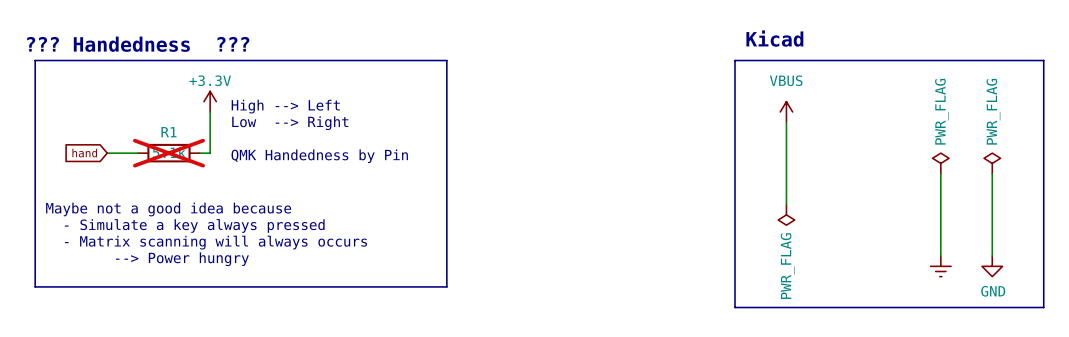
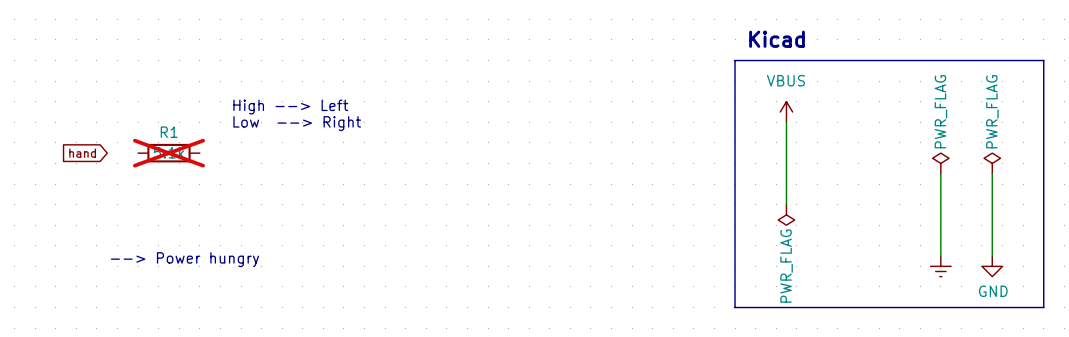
text: ??? Handedness ??? (138, 44) -> none
line: (35, 60) (446, 60) (446, 286) (35, 286) (35, 60) -> none
power symbol: +3.3V (210, 101) -> none
wire: (210, 111) (210, 153) (199, 153) -> none
wire: (107, 153) (138, 153) -> none
text: QMK Handedness by Pin (319, 156) -> none
text: Maybe not a good idea because (168, 209) -> none
text: - Simulate a key always pressed (194, 225) -> none
text: - Matrix scanning will always occurs (215, 242) -> none

